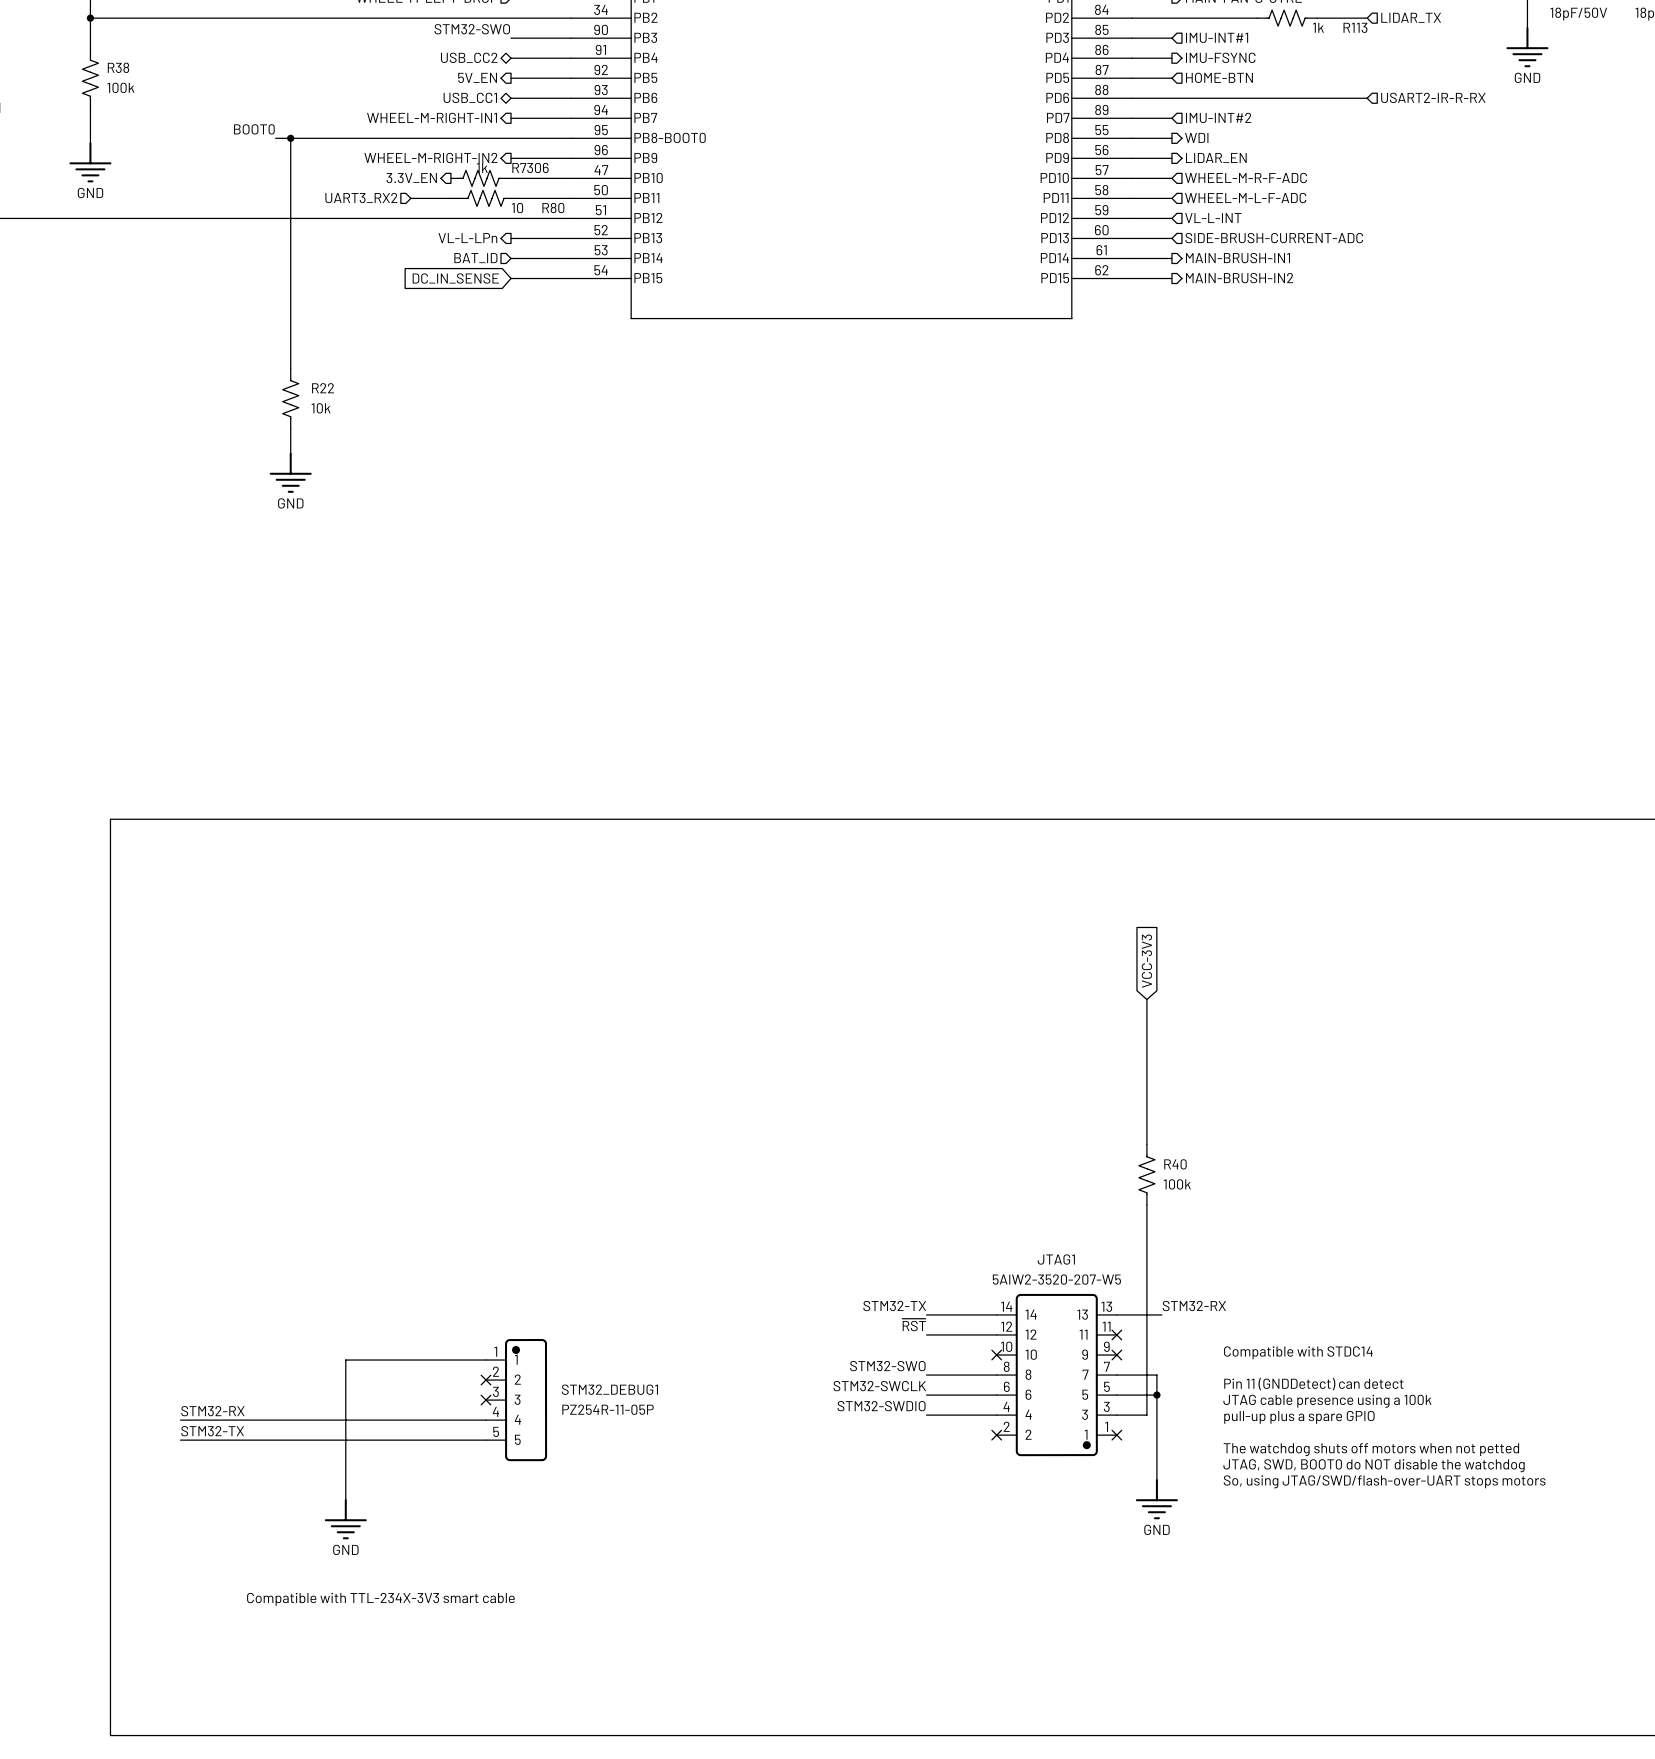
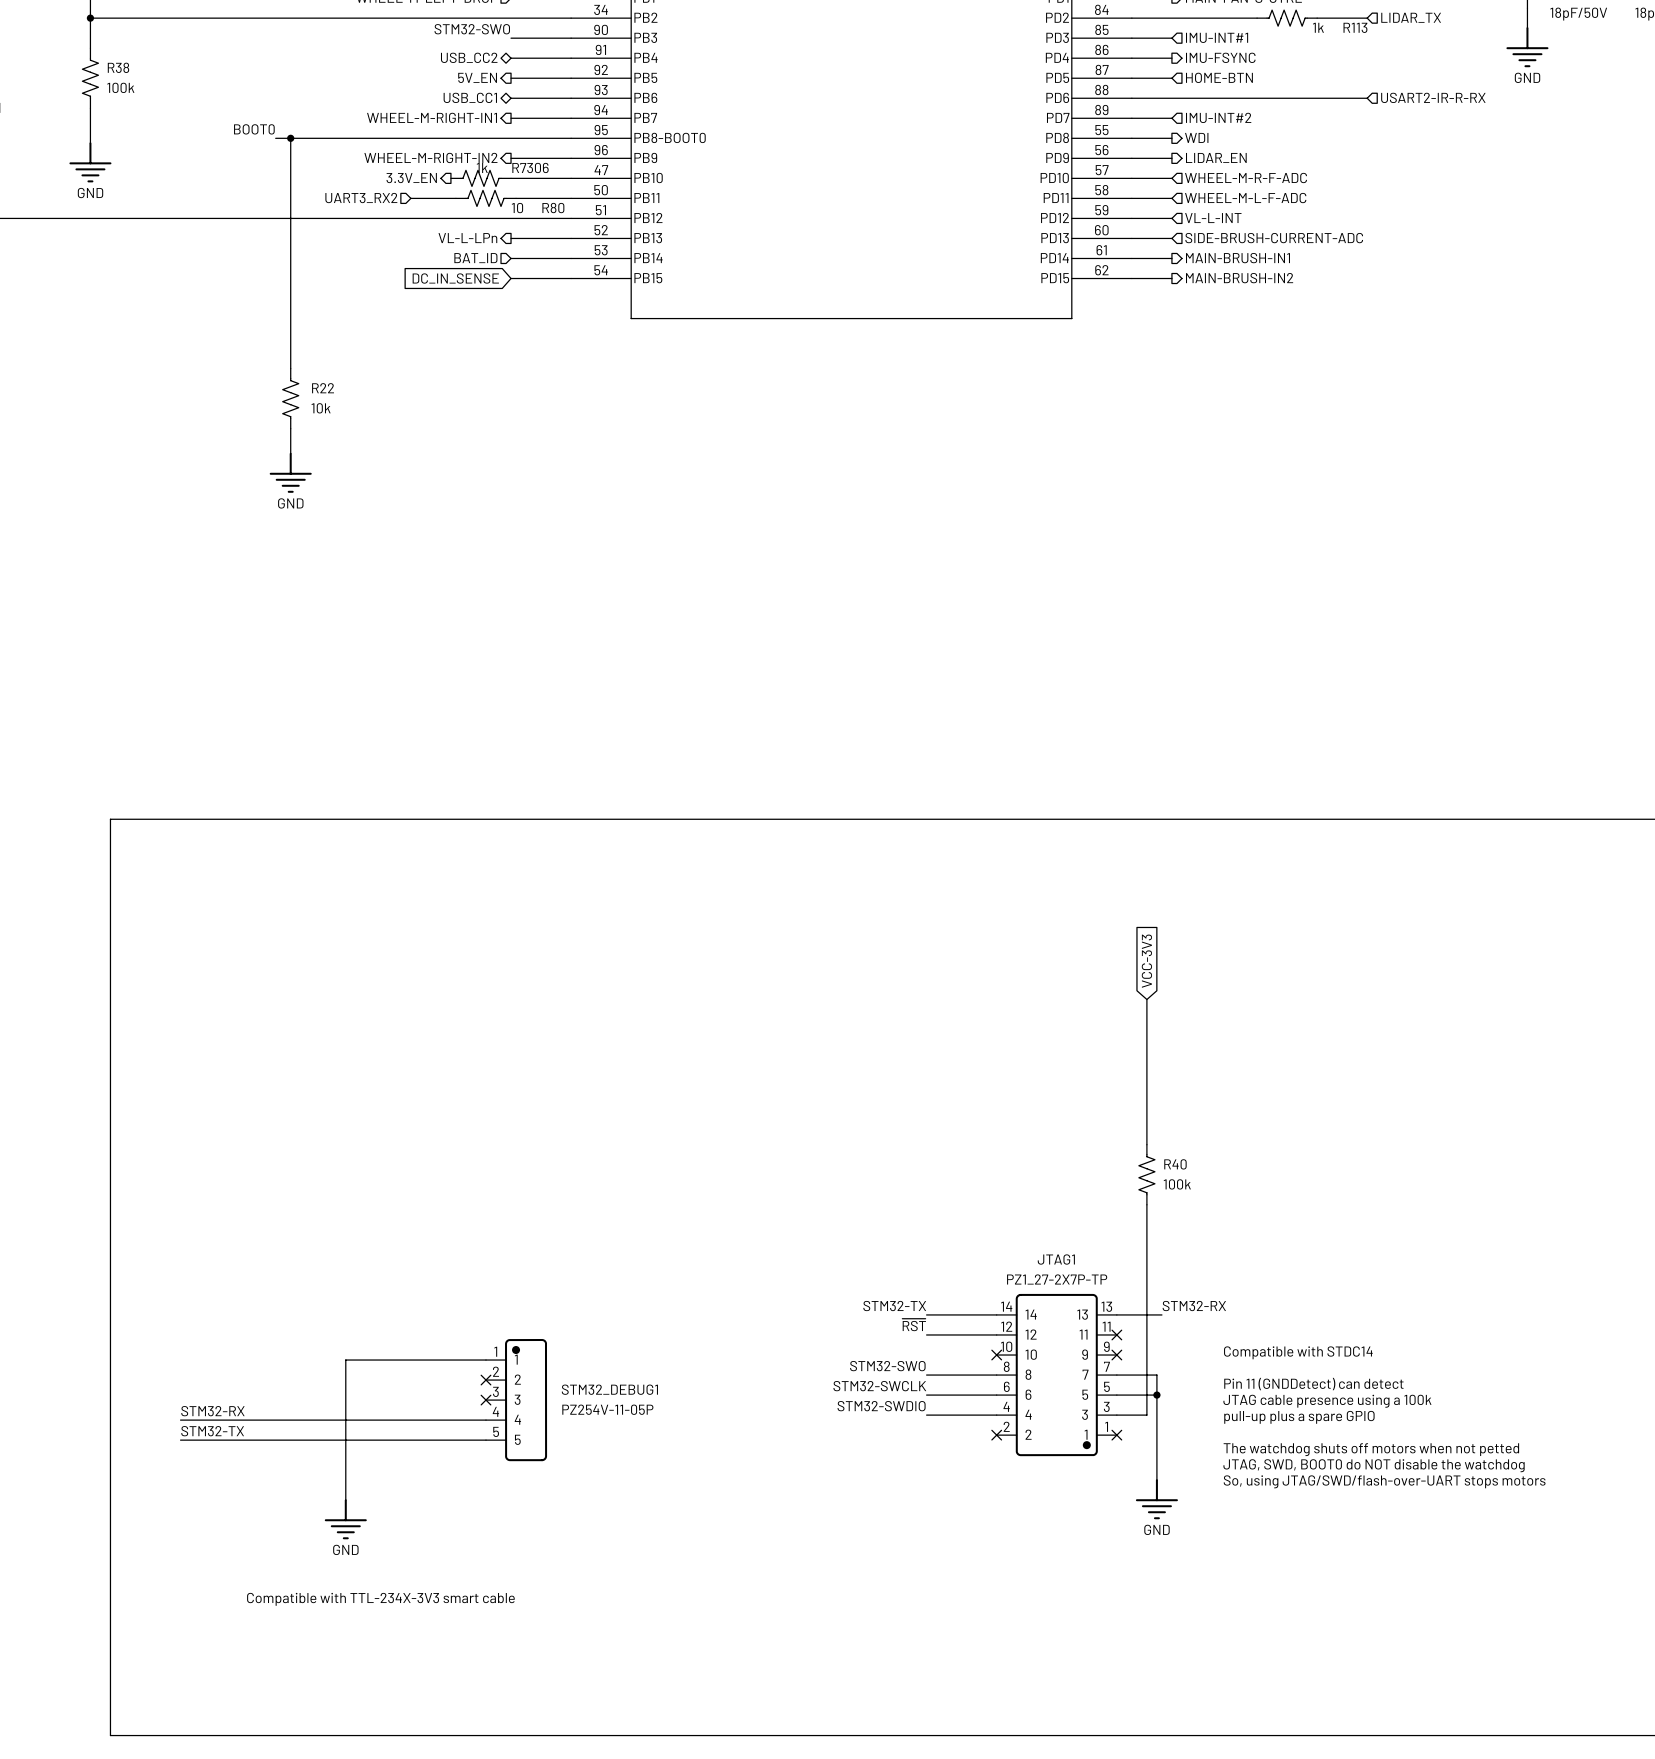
JTAG1 value: 5AIW2-3520-207-W5 (1056, 1279) -> PZ1_27-2X7P-TP (1057, 1279)
STM32_DEBUG1 value: PZ254R-11-05P (608, 1409) -> PZ254V-11-05P (607, 1409)

